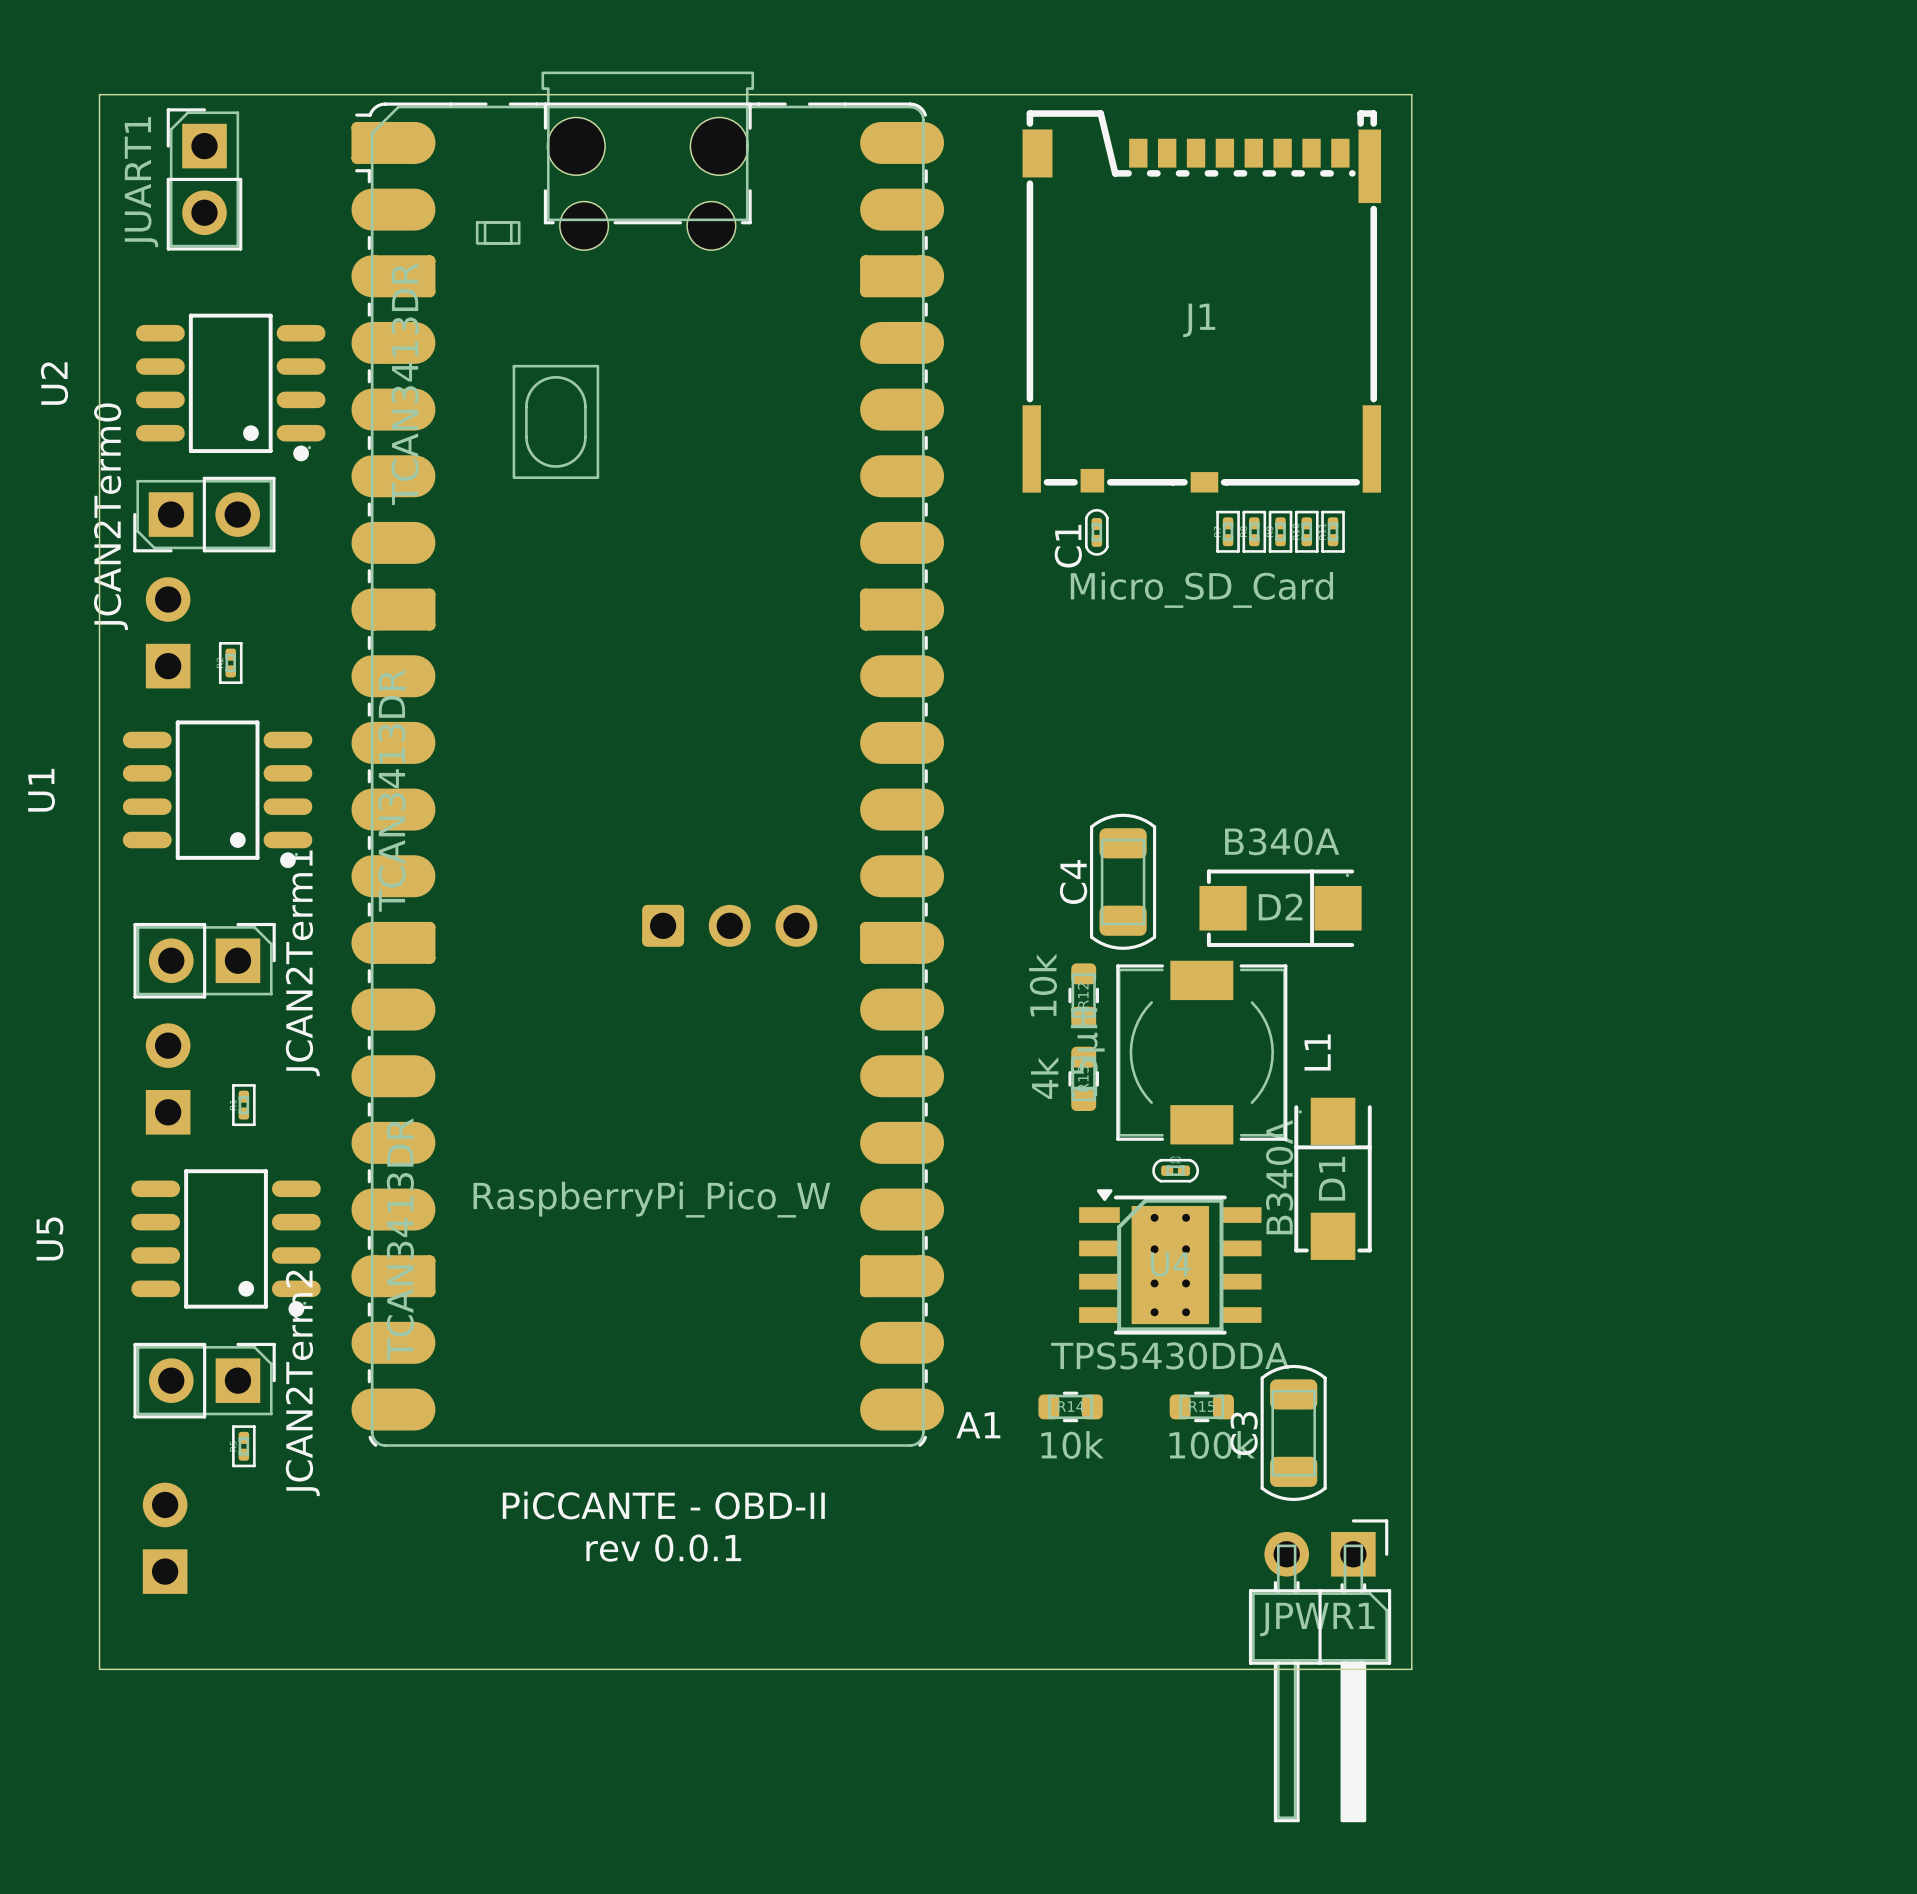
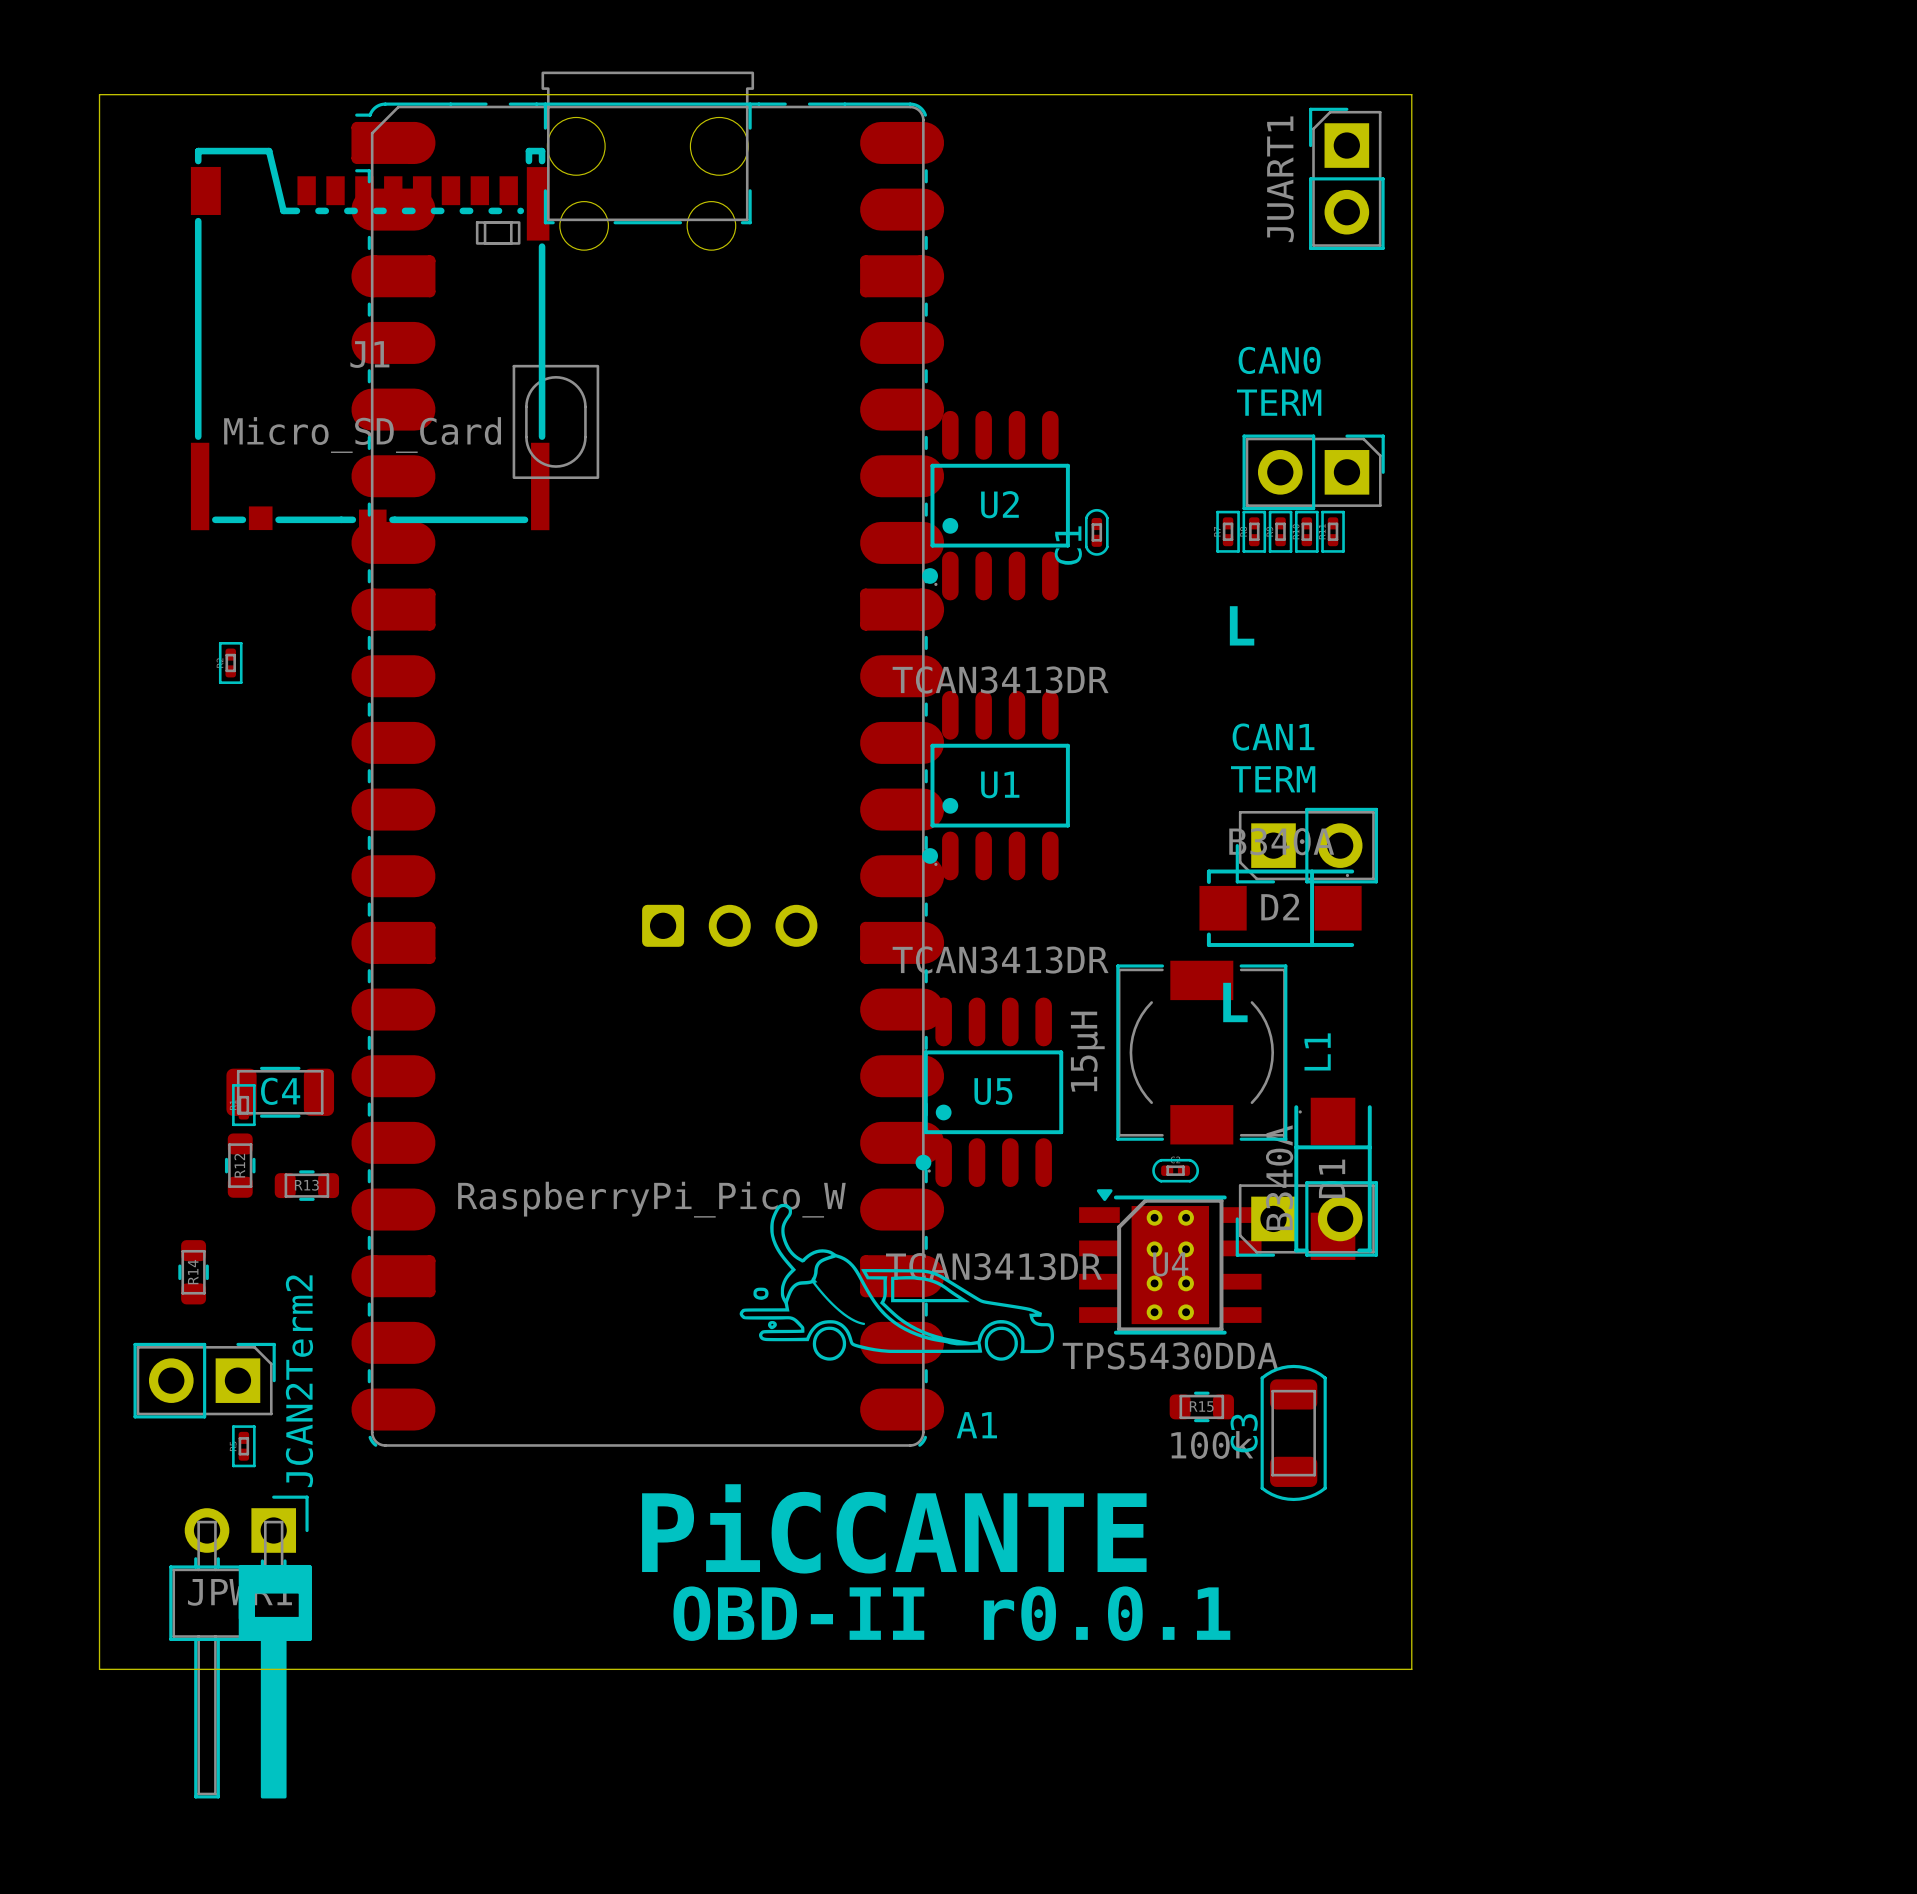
JUART1 position: (204, 179) -> (1346, 178)
J1 position: (1201, 301) -> (370, 338)
text: none -> CAN0 (1279, 360)
U2 name position: U2 (54, 383) -> U2 (999, 504)
U2 rotation: 0° (230, 387) -> 90° clockwise (996, 505)
U2 position: (230, 387) -> (996, 505)
text: none -> TERM (1279, 402)
part: none -> (1313, 472)
JCAN2Term0: (204, 514) -> none
J1 value position: Micro_SD_Card (1201, 589) -> Micro_SD_Card (362, 435)
text: none -> L (1242, 625)
part: (168, 632) -> none
text: none -> CAN1 (1273, 737)
text: none -> TERM (1273, 779)
U1 name position: U1 (41, 790) -> U1 (1000, 784)
U1 rotation: 0° (217, 794) -> 90° clockwise (996, 785)
U1 position: (217, 794) -> (996, 785)
C4 footprint: [1090, 813, 1157, 950] -> [226, 1066, 335, 1118]
part: none -> (1306, 845)
JCAN2Term1: (204, 960) -> none
R12 value: 10k (1043, 985) -> none
R12 position: (1083, 995) -> (240, 1165)
text: none -> L (1235, 1002)
part: (168, 1078) -> none
R13 value: 4k (1044, 1078) -> none
R13 rotation: 0° (1083, 1078) -> 90° clockwise (306, 1185)
R13 position: (1083, 1078) -> (306, 1185)
drawing: none -> [739, 1203, 1055, 1361]
part: none -> (1306, 1218)
U5 name position: U5 (49, 1238) -> U5 (993, 1091)
U5 rotation: 0° (226, 1243) -> 90° clockwise (989, 1092)
U5 position: (226, 1243) -> (989, 1092)
R14 rotation: 0° (1070, 1406) -> 90° clockwise (193, 1272)
R14 position: (1070, 1406) -> (193, 1272)
R14 value: 10k (1072, 1444) -> none
text: PiCCANTE - OBD-II (663, 1505) -> none
text: none -> PiCCANTE ️️️️ (894, 1528)
part: (165, 1538) -> none
text: rev 0.0.1 (663, 1548) -> none
drawing: none -> [238, 1564, 312, 1641]
text: none -> OBD-II r0.0.1 (951, 1613)
JPWR1 position: (1320, 1670) -> (240, 1647)

